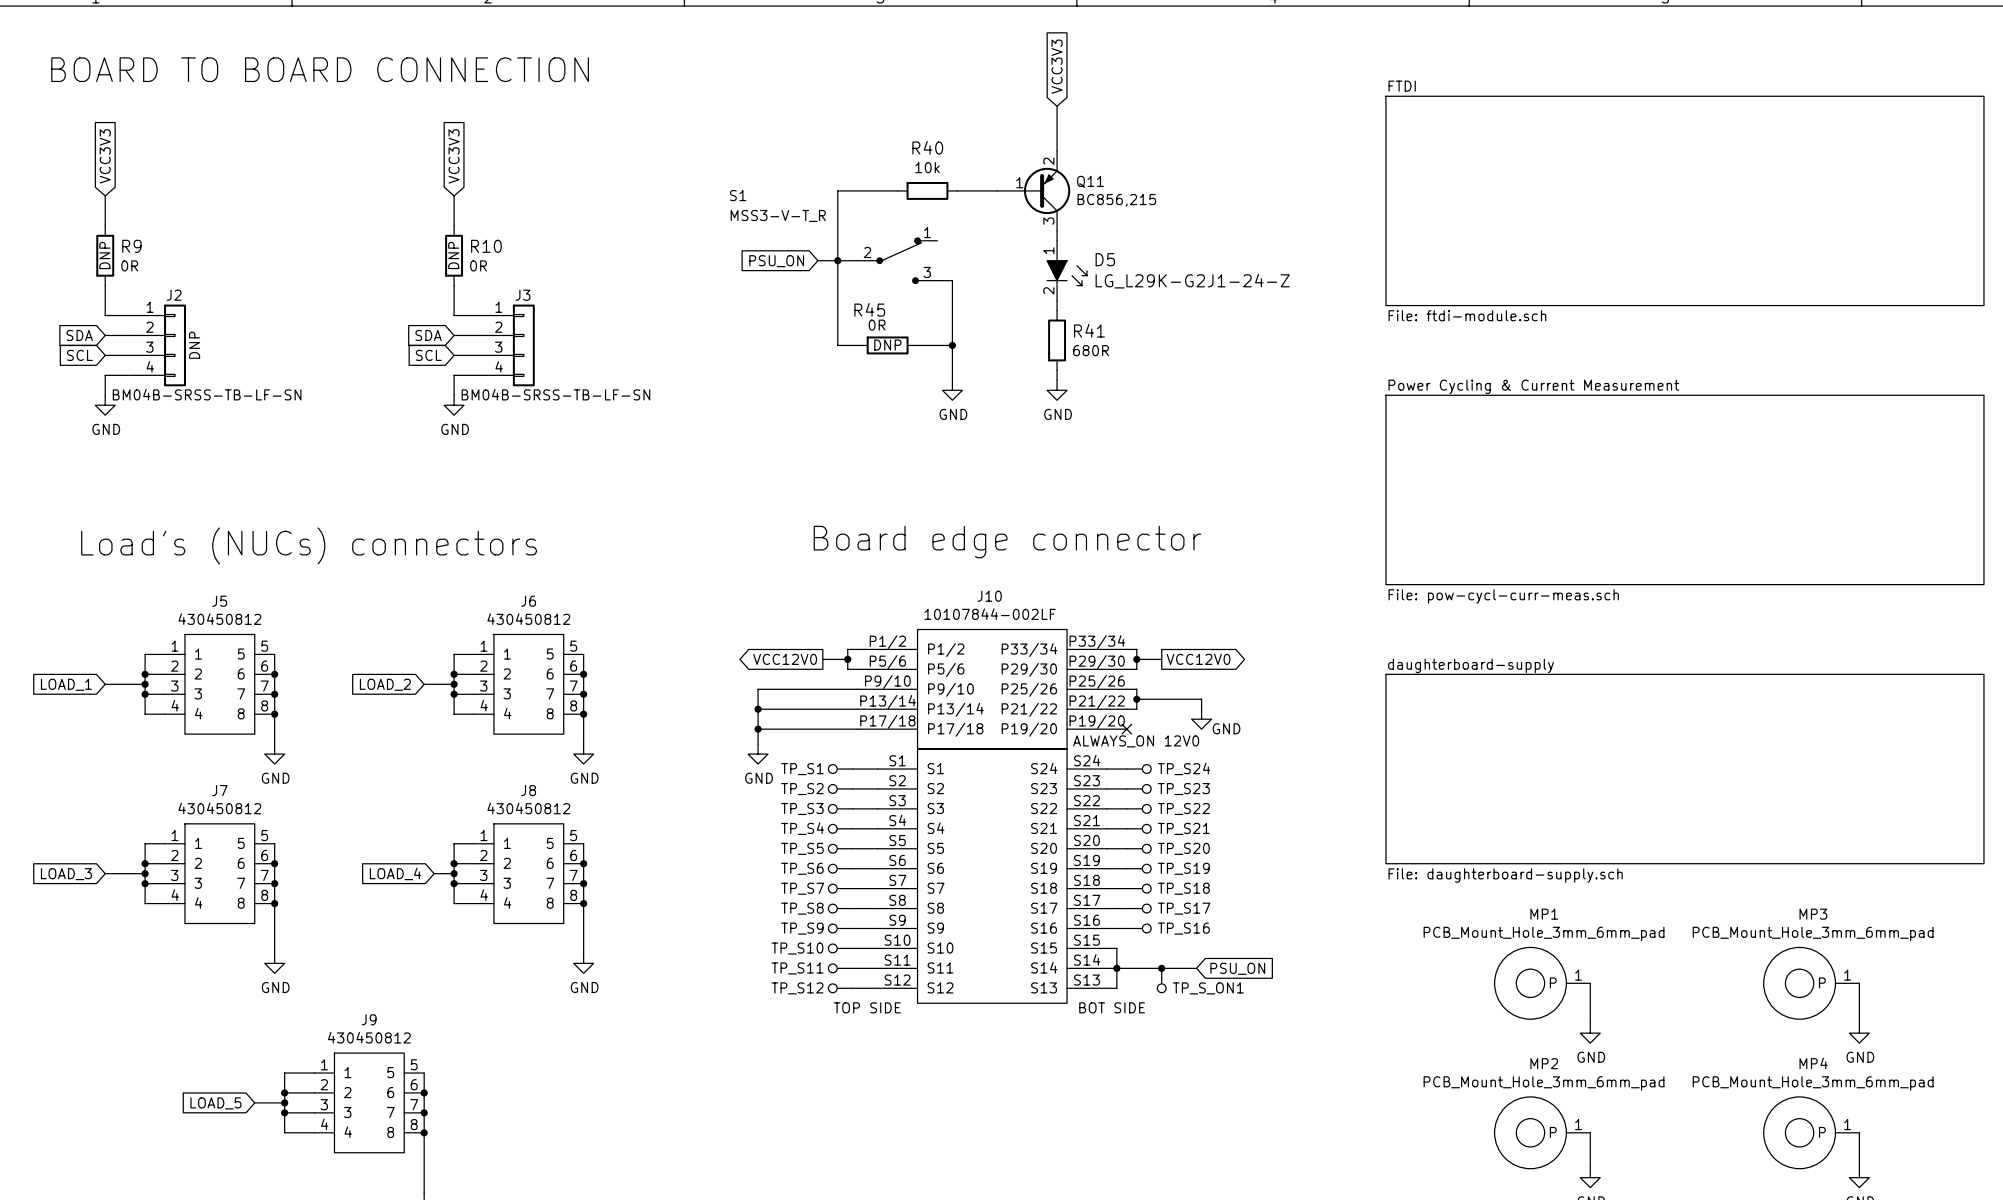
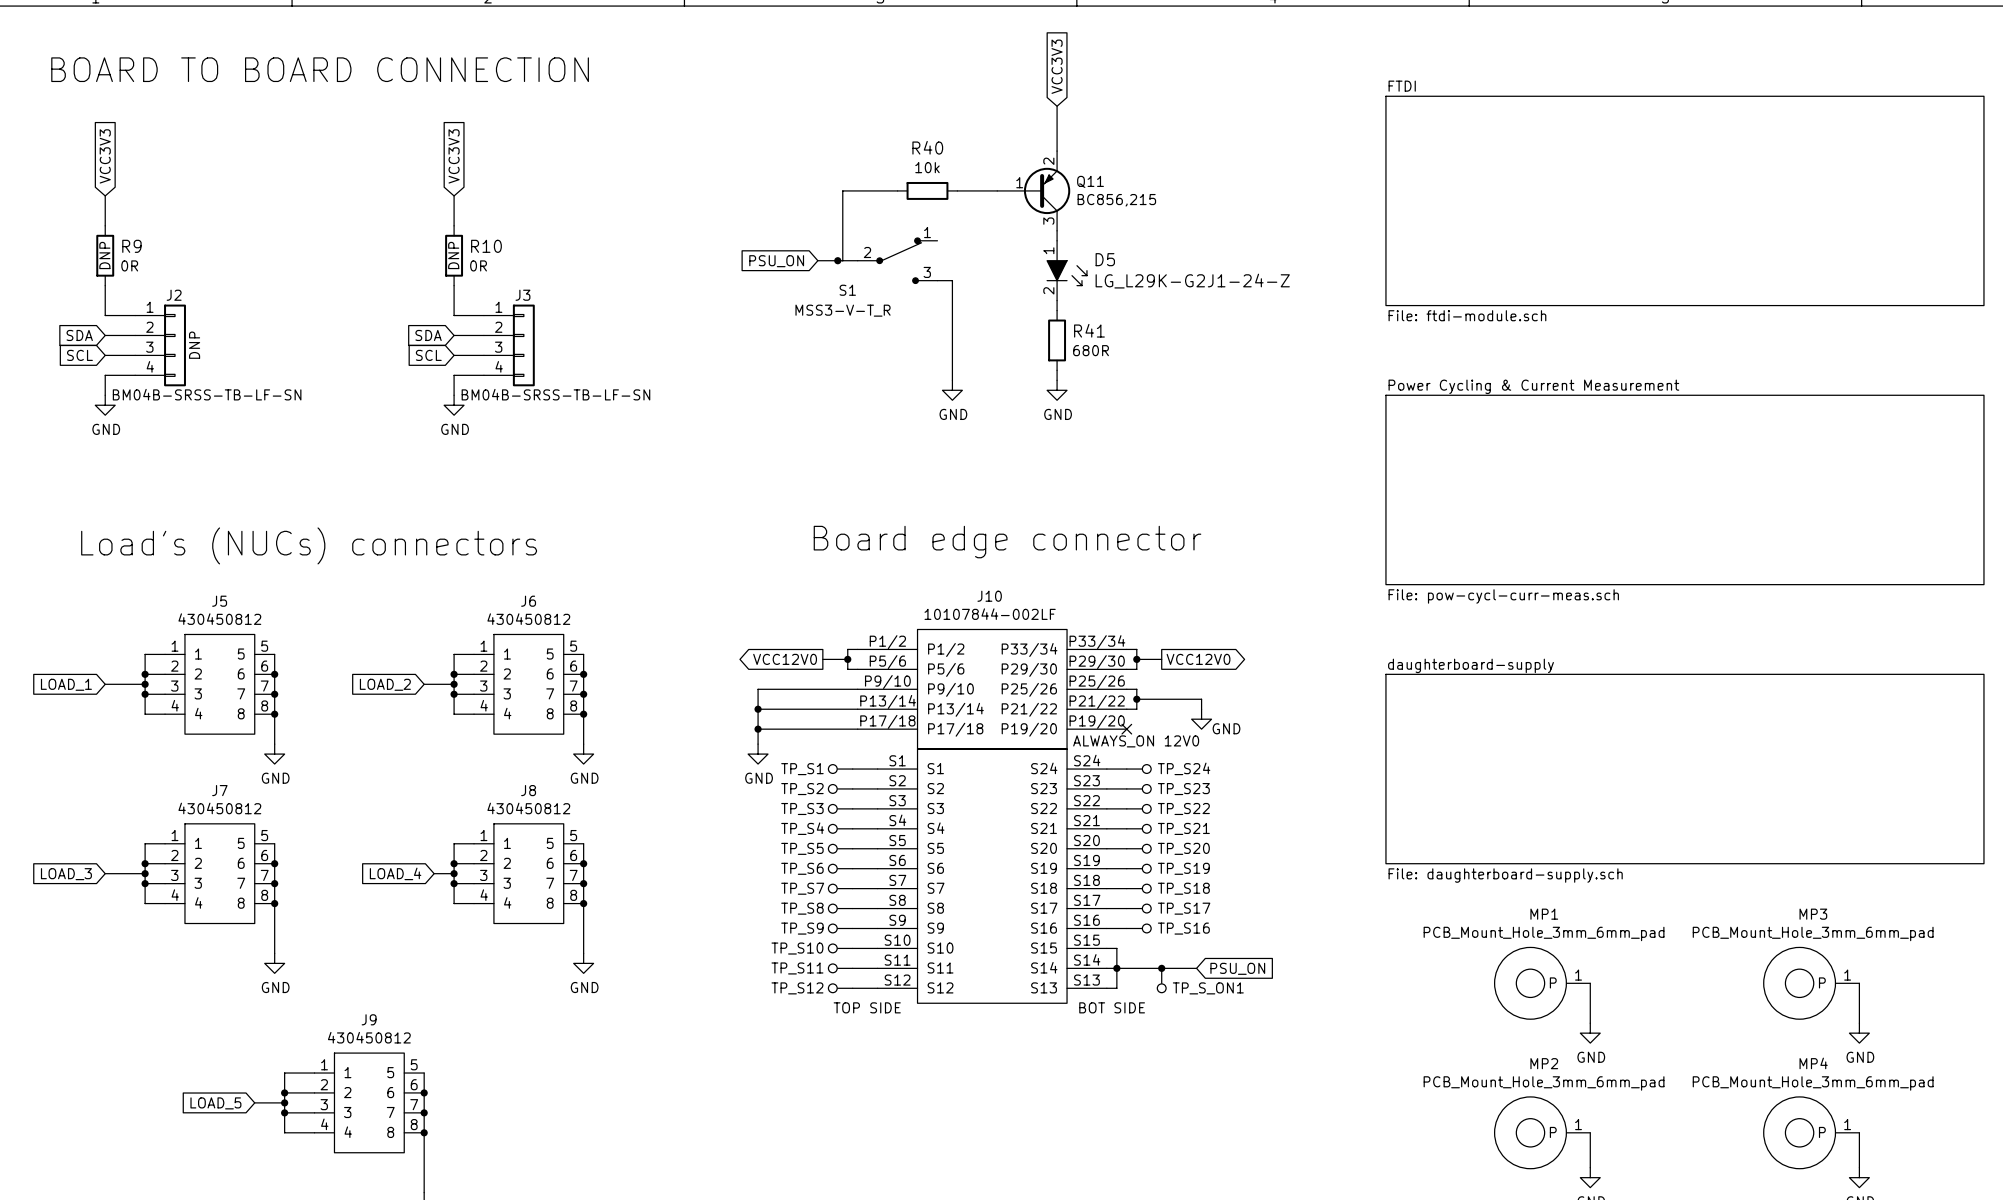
wire: (842, 190) (837, 190) (837, 345) (857, 345) -> (842, 190) (842, 260)
S1 name position: S1 (738, 195) -> S1 (847, 290)
S1 value position: MSS3-V-T_R (778, 215) -> MSS3-V-T_R (843, 310)
R45: (887, 345) -> none
wire: (917, 345) (952, 345) -> none
junction: (952, 345) -> none

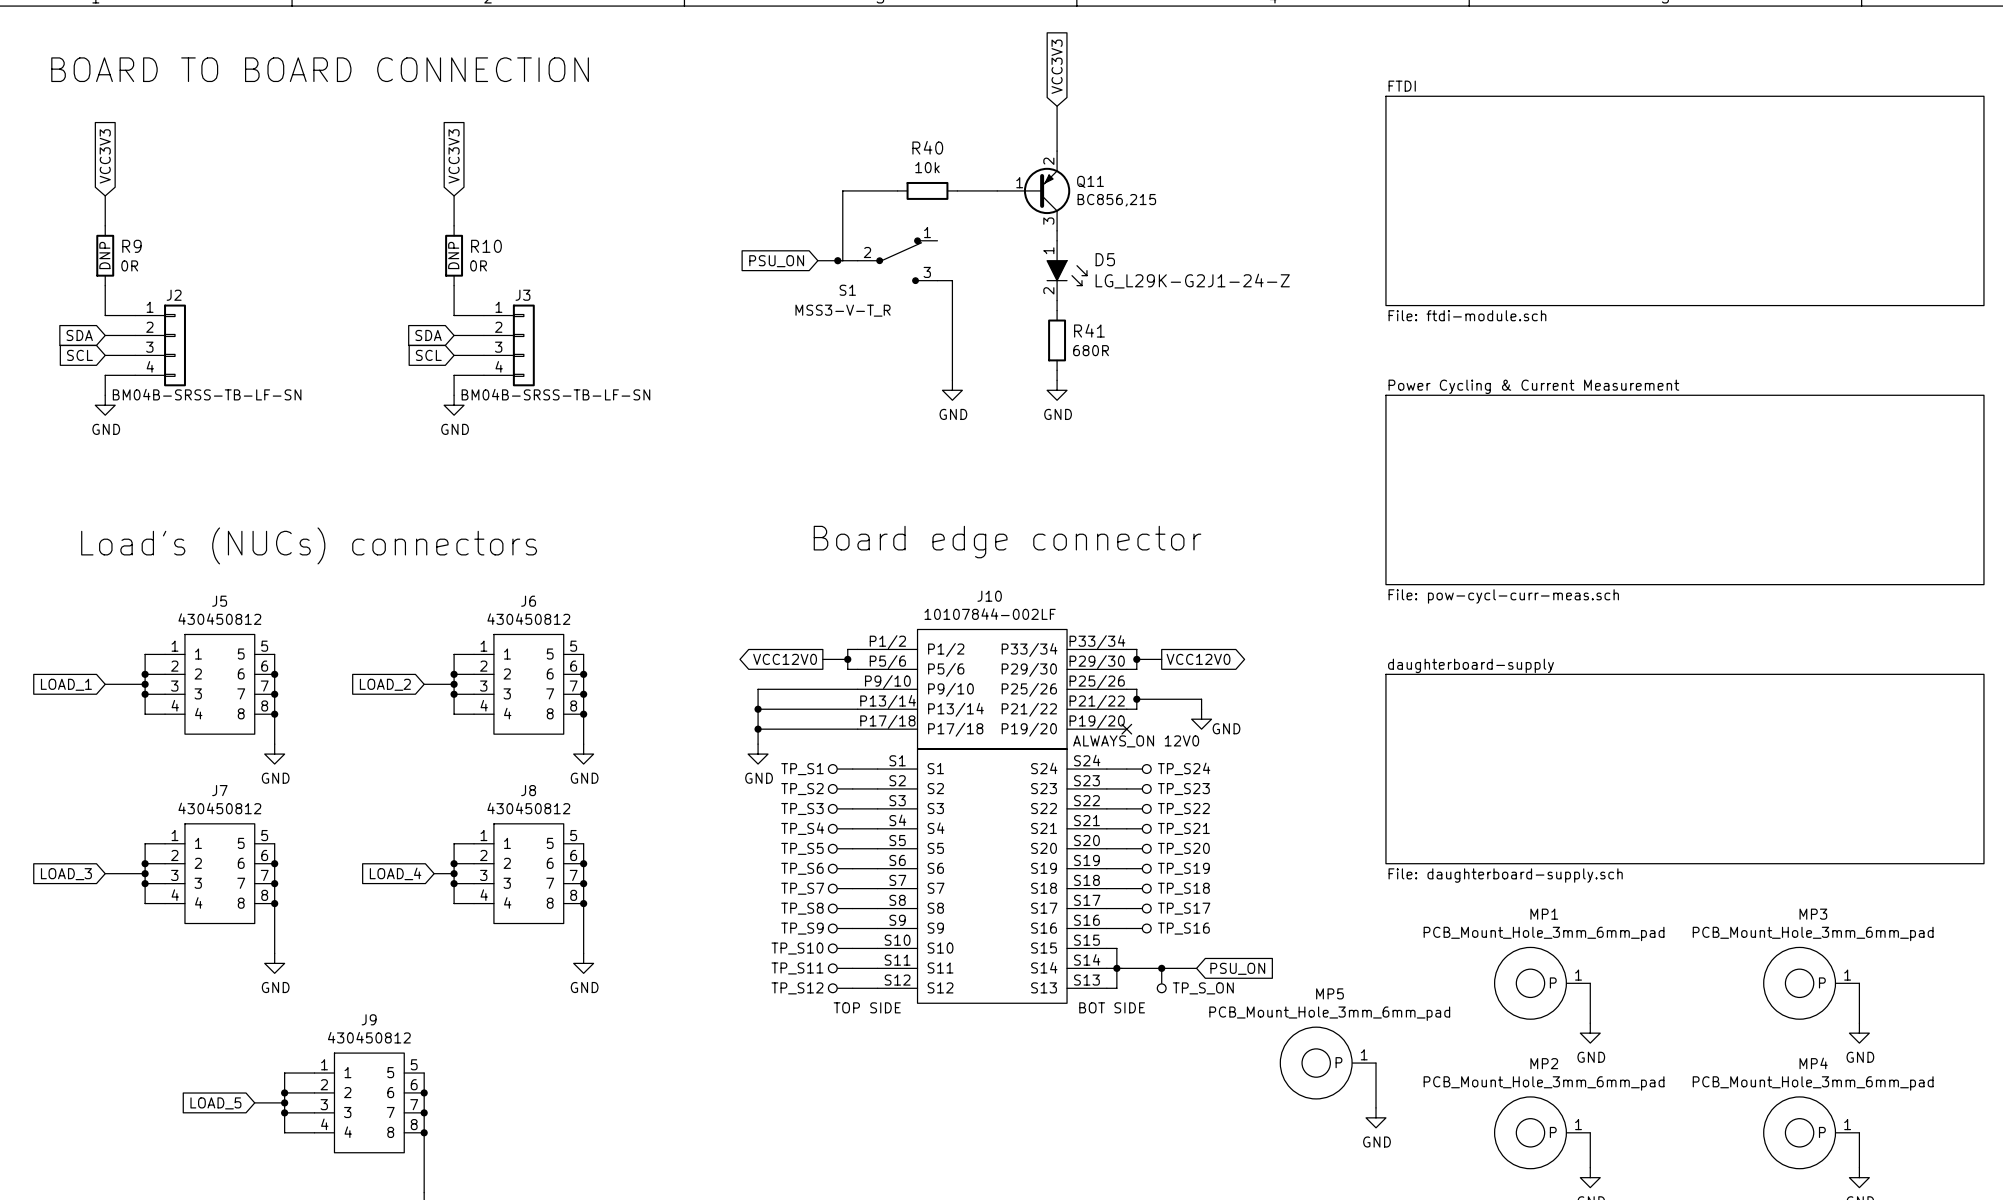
J2 text: DNP (194, 345) -> none
TP_S_ON1 name: TP_S_ON1 (1208, 988) -> TP_S_ON (1203, 988)
MP5: none -> PCB_Mount_Hole_3mm_6mm_pad (1328, 1063)
wire: none -> (1376, 1063) (1376, 1107)
power symbol: none -> GND (1376, 1117)

